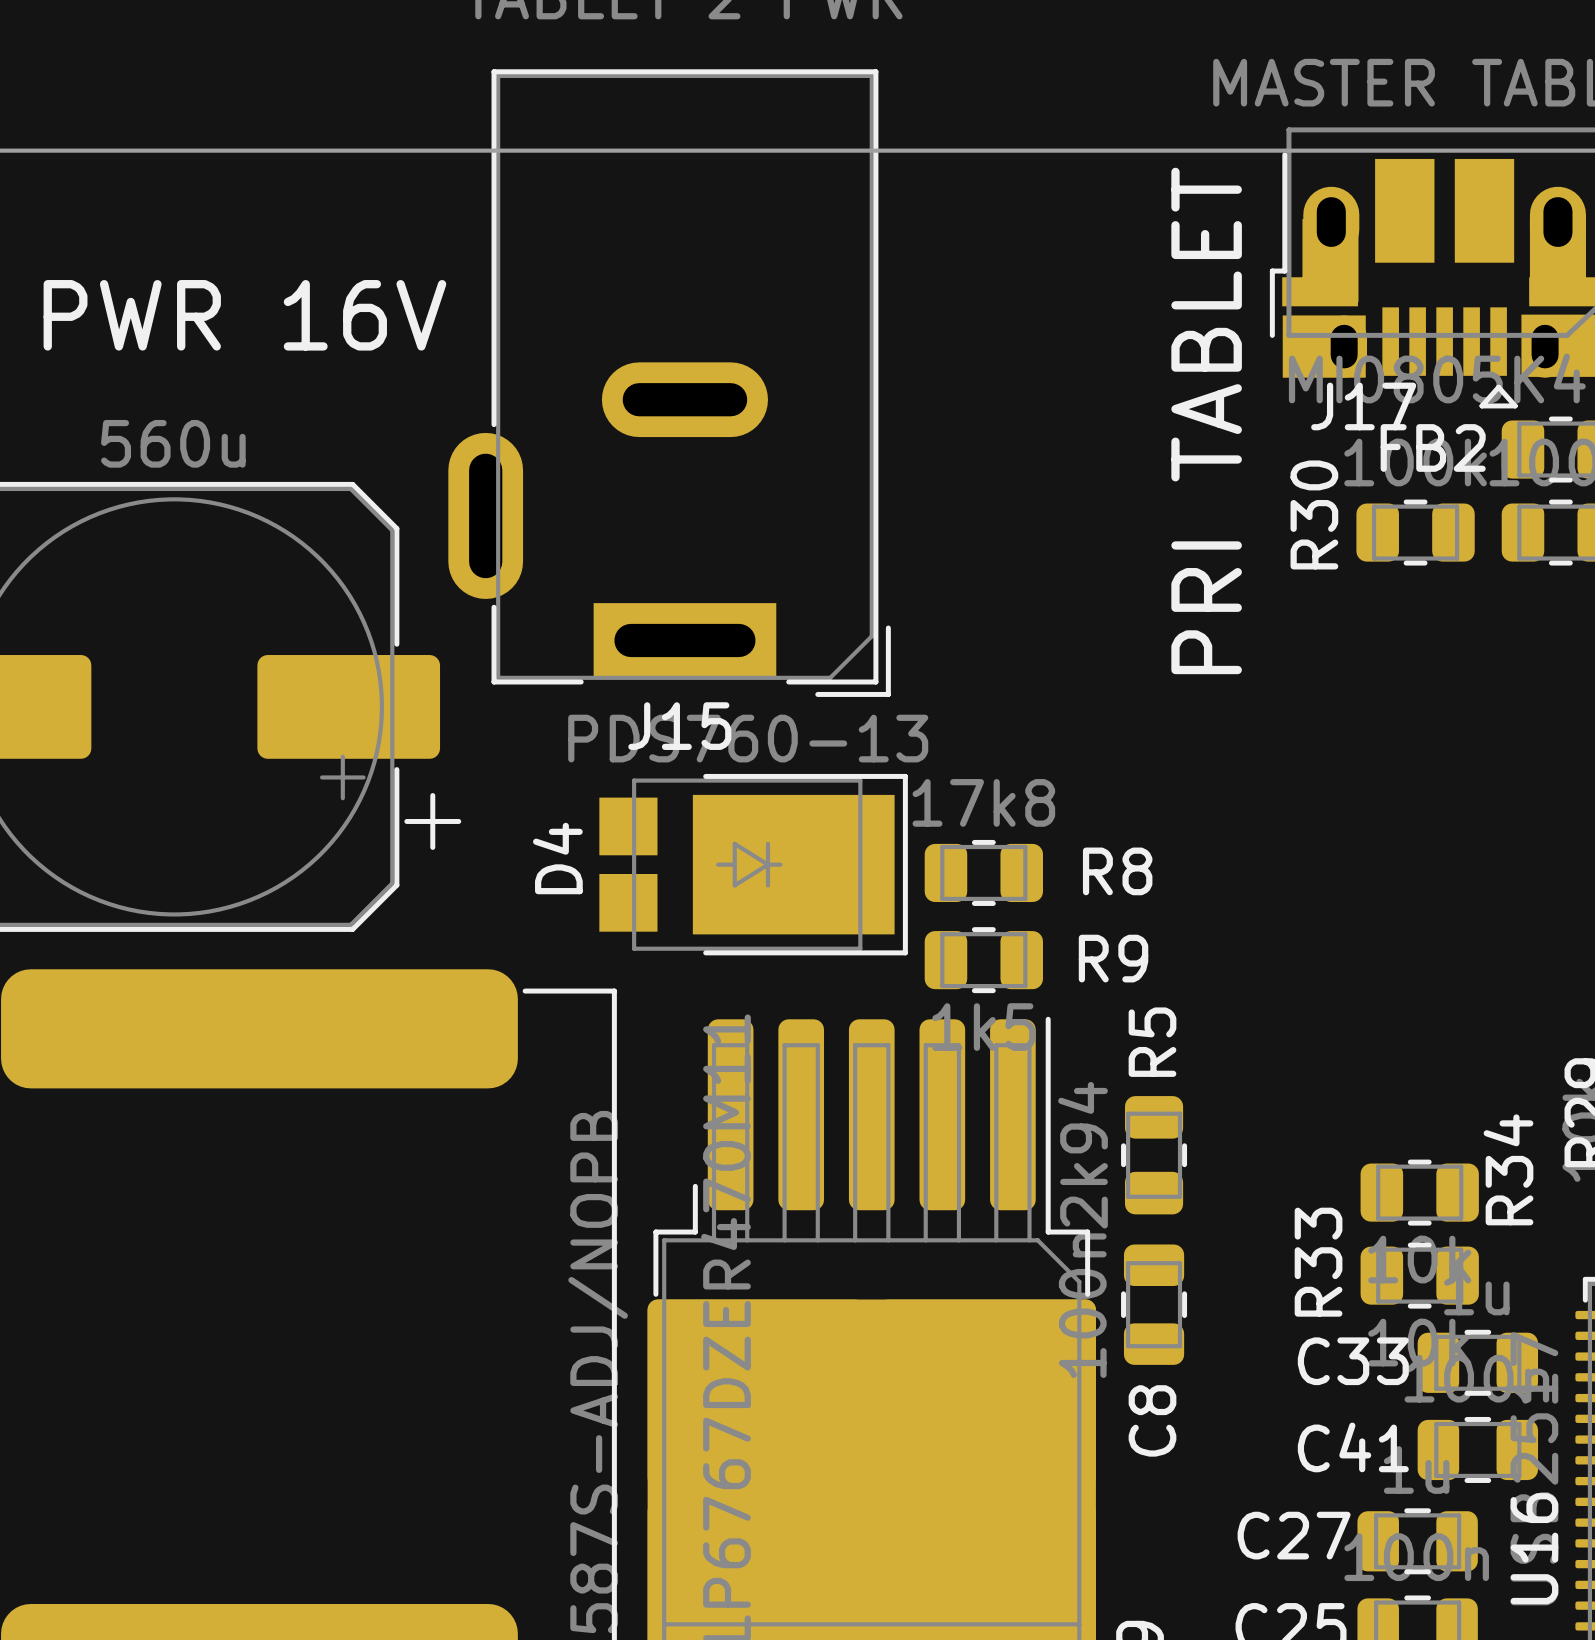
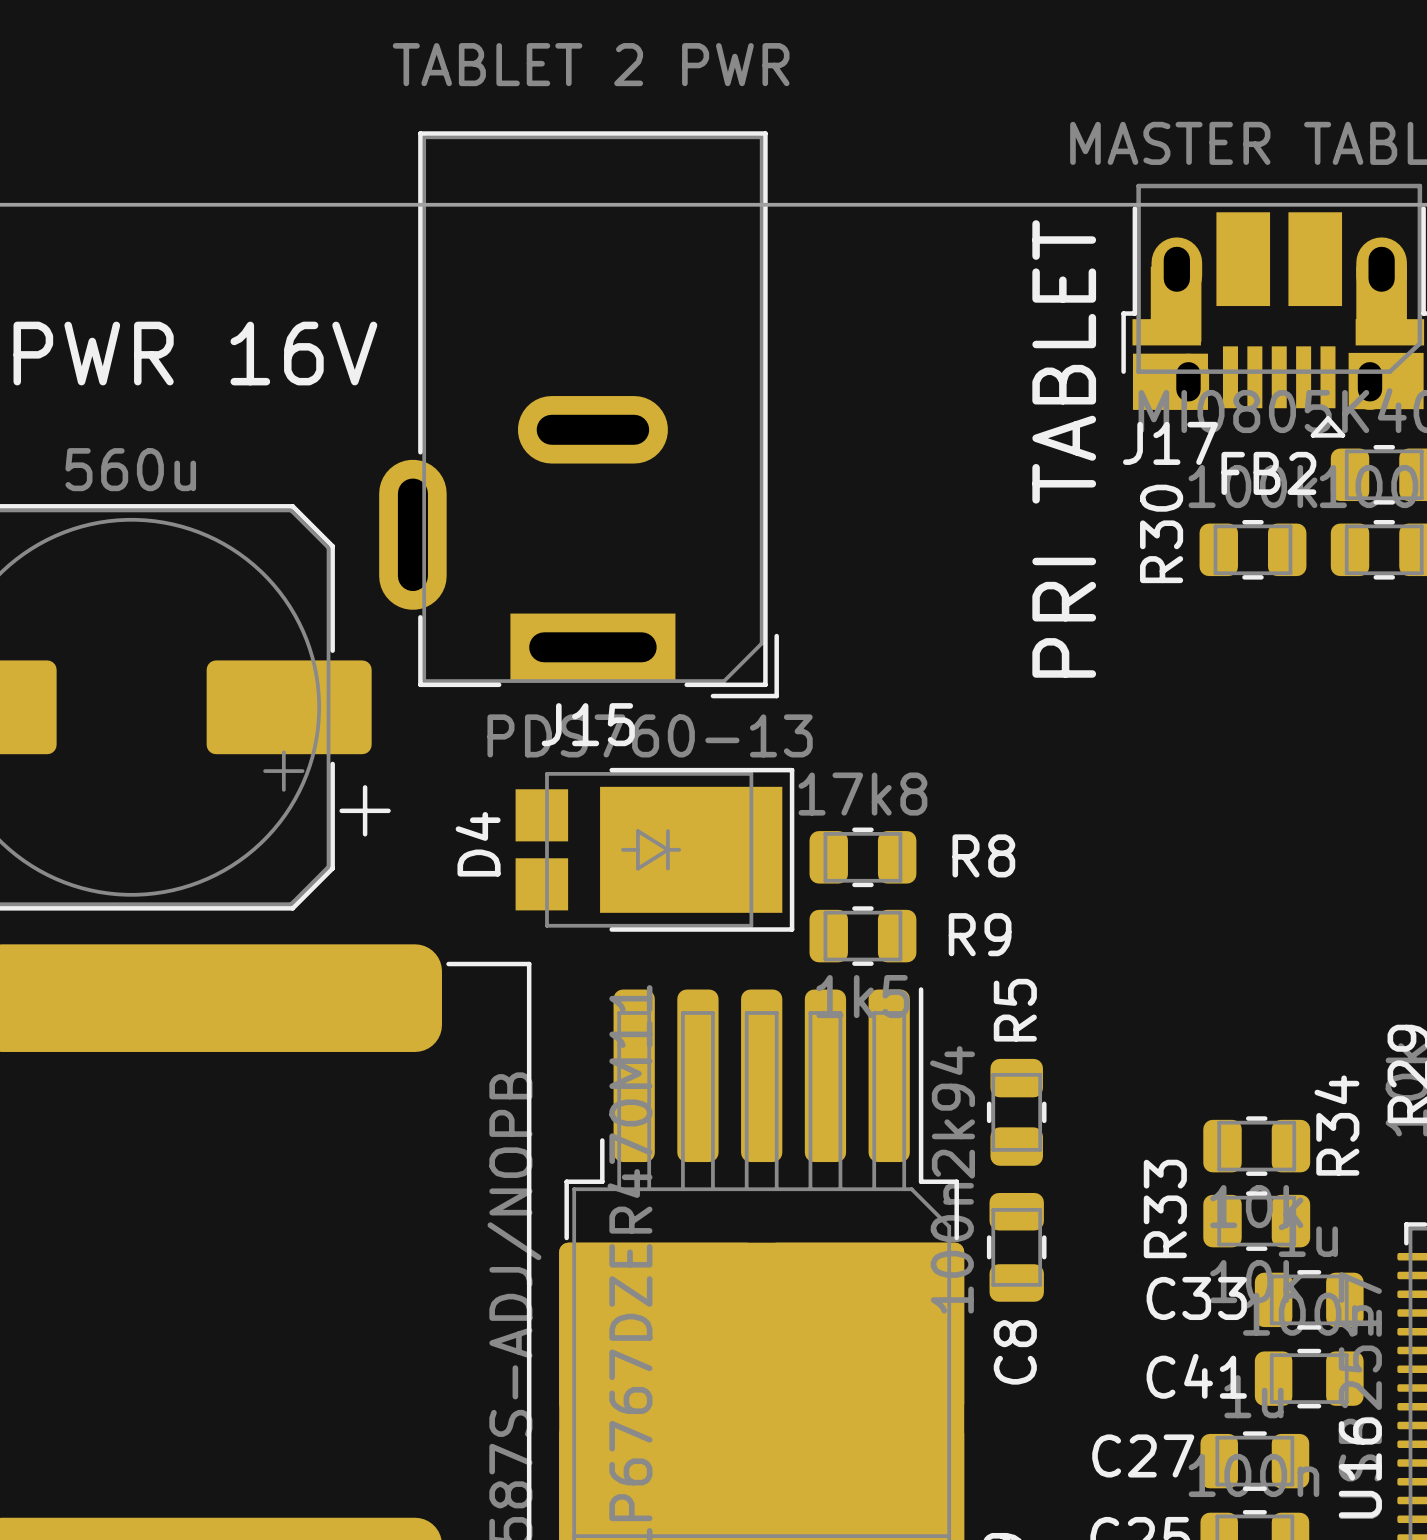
J17 name position: J17 (1363, 406) -> J17 (1170, 443)

